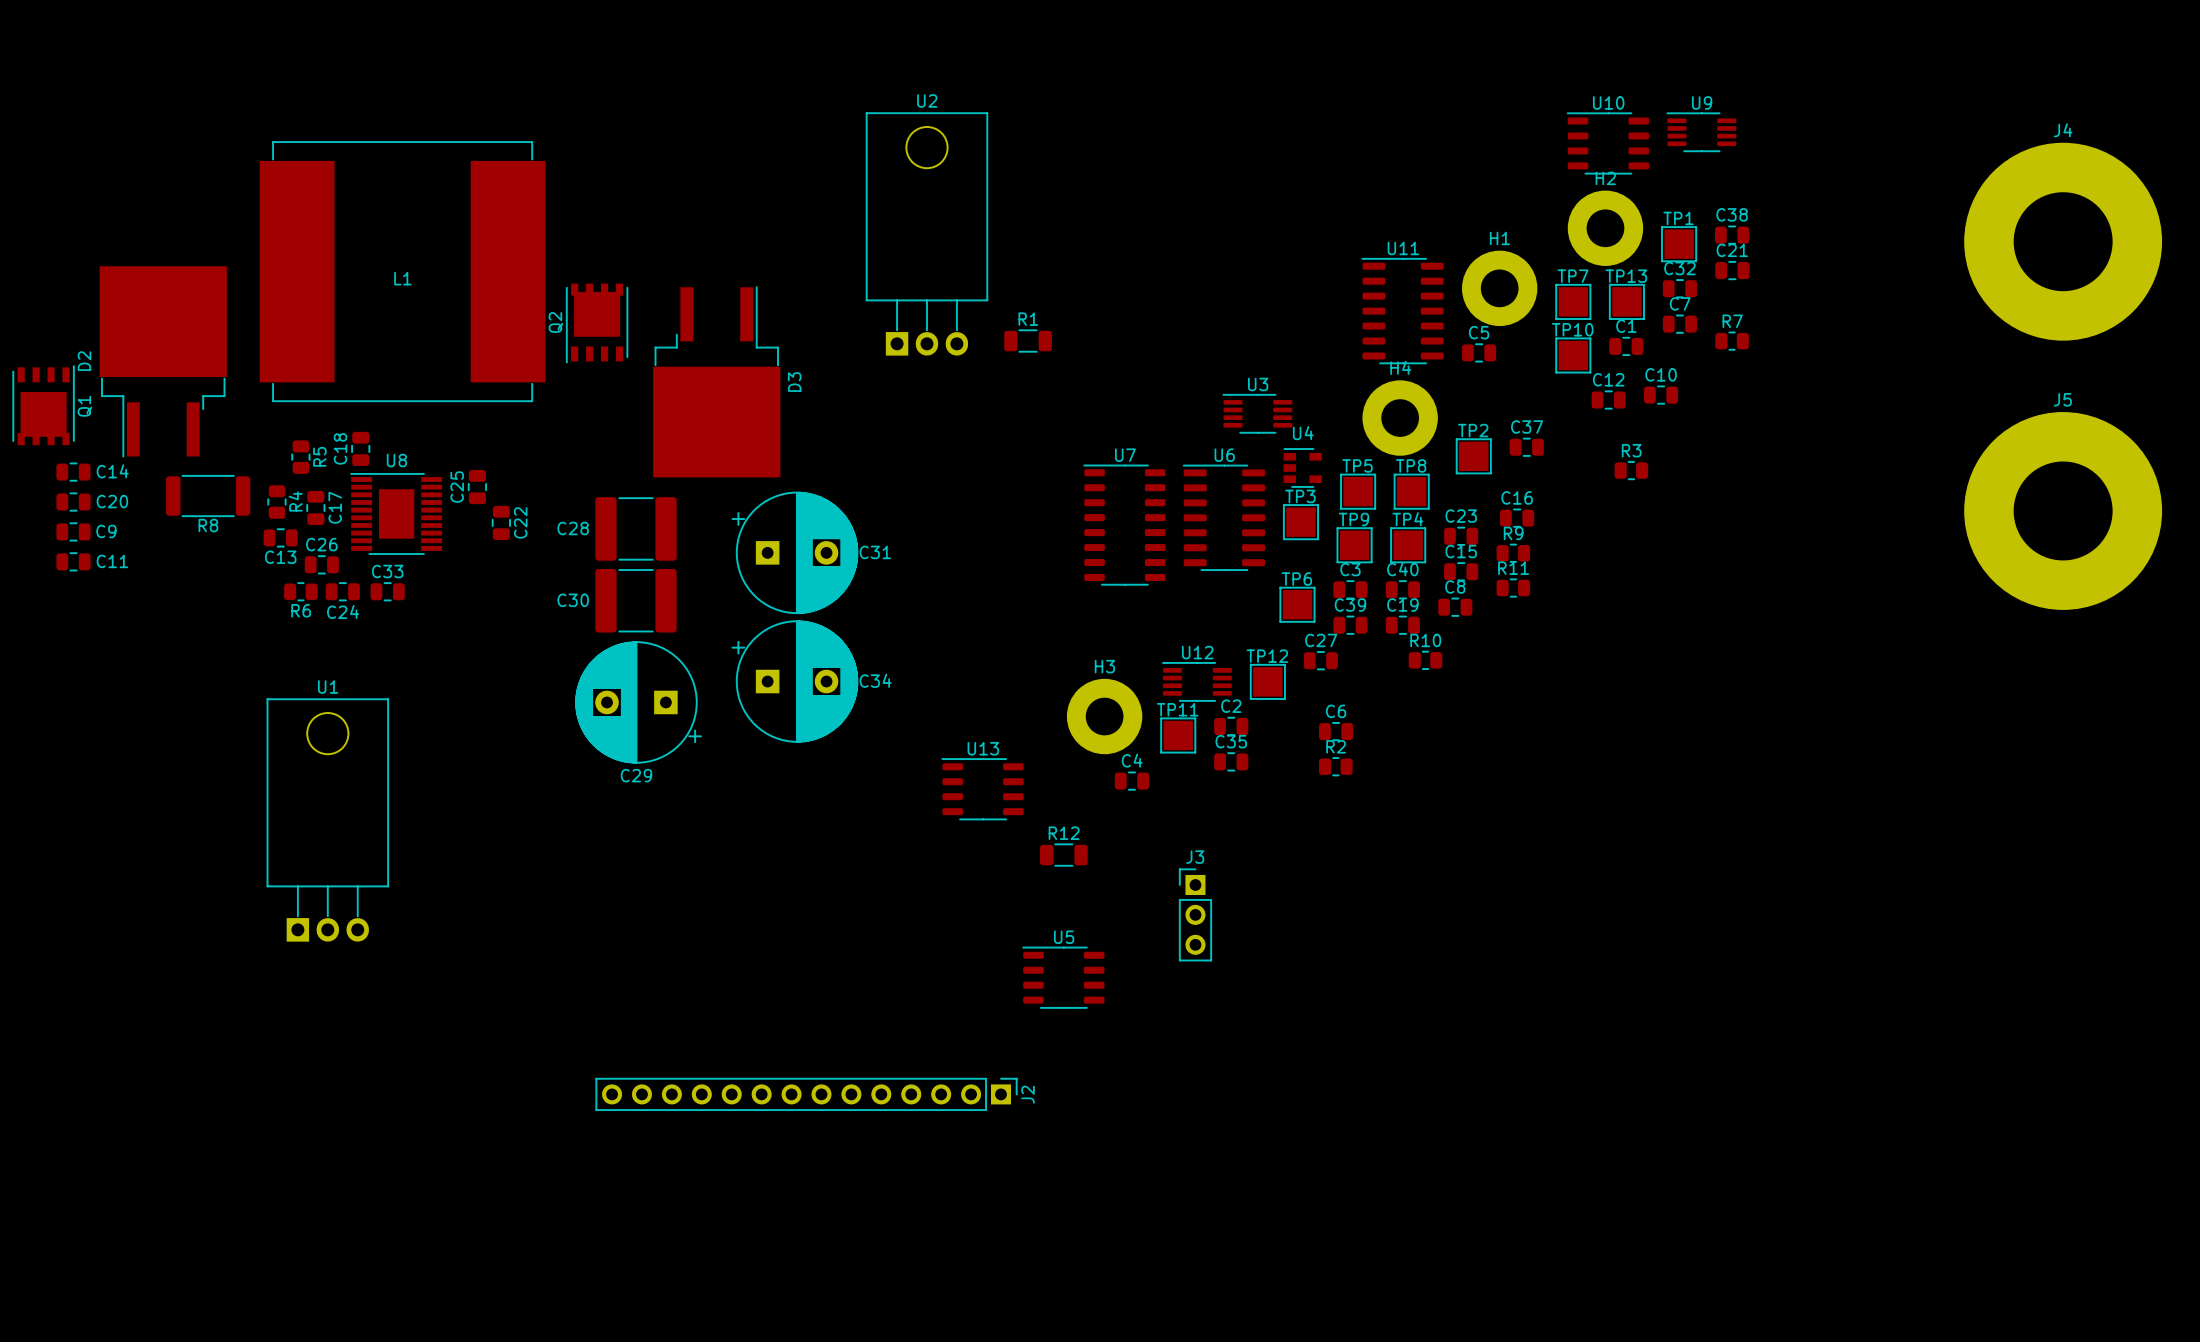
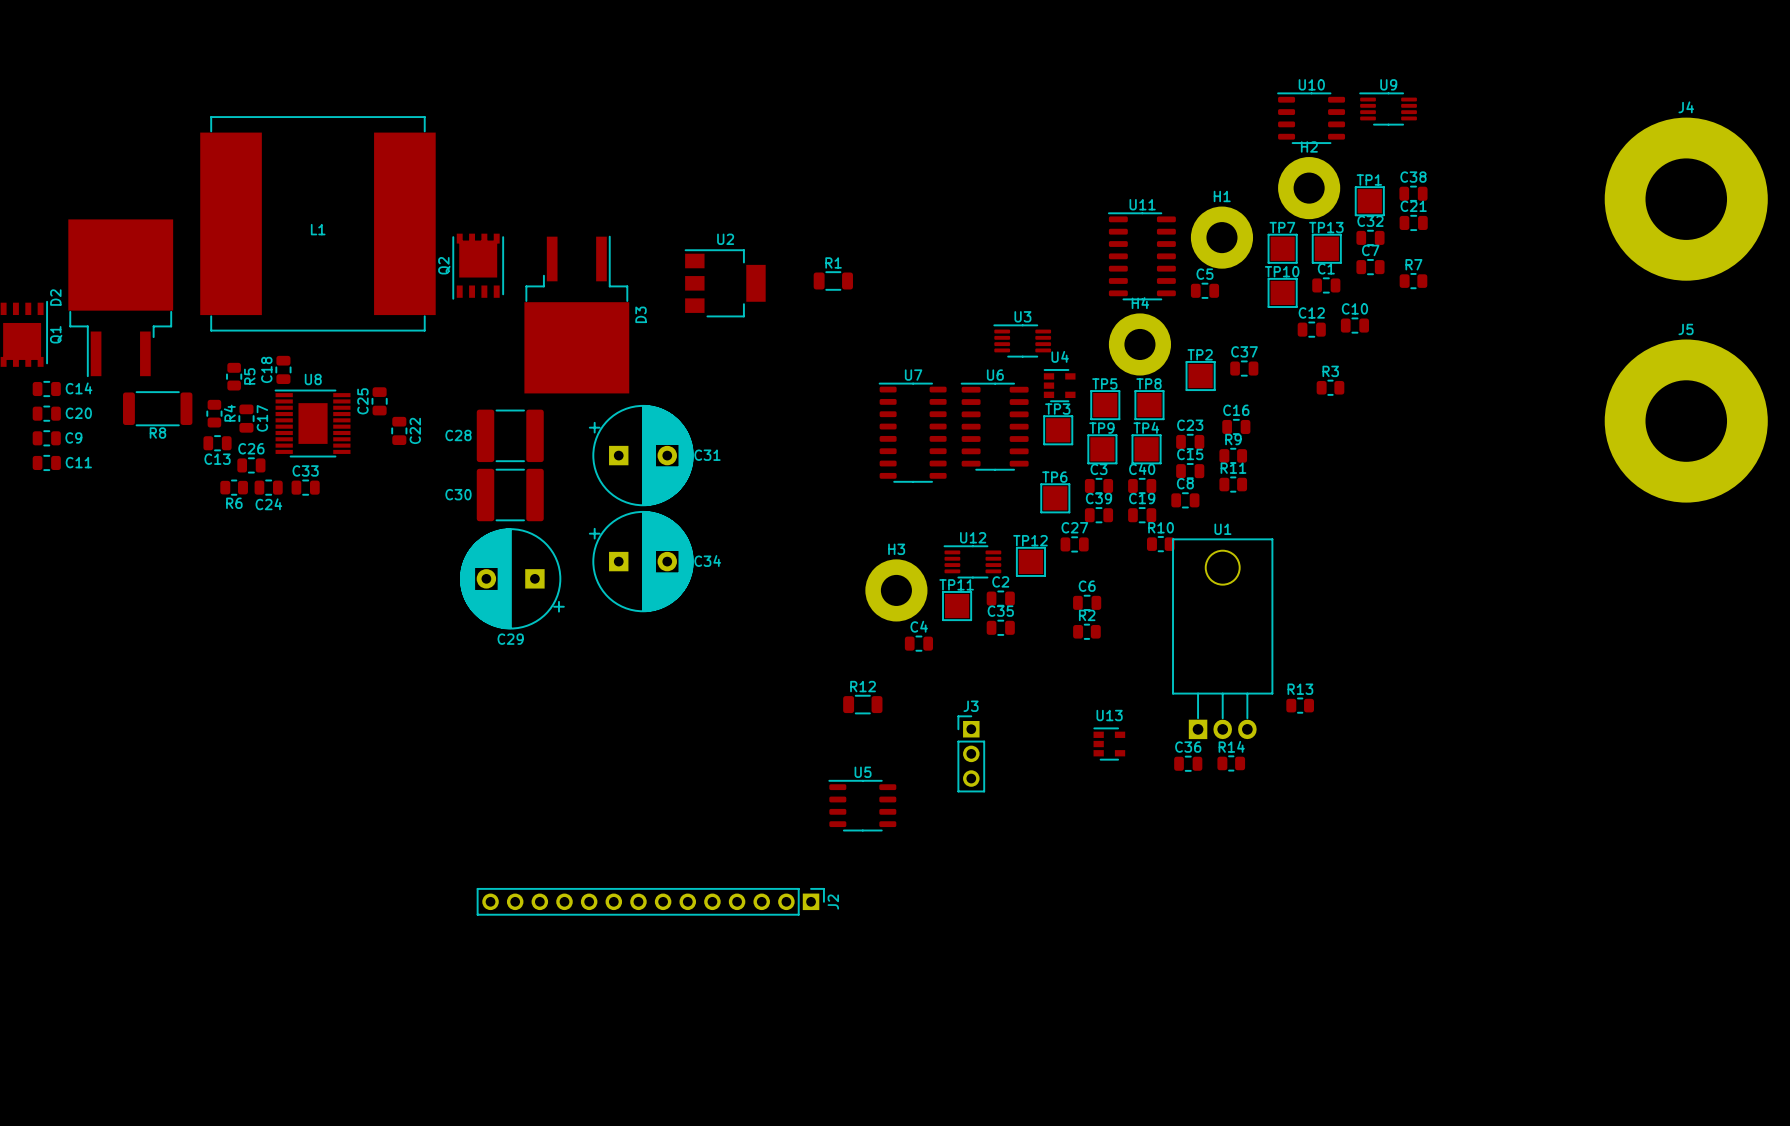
U2 name position: U2 (927, 100) -> U2 (725, 239)
U2 footprint: [865, 112, 988, 356] -> [685, 249, 766, 318]
U13 footprint: [941, 758, 1024, 821] -> [1093, 727, 1126, 761]
U1 position: (327, 820) -> (1222, 638)
R13: none -> (1300, 705)
C36: none -> (1188, 763)
R14: none -> (1231, 763)

